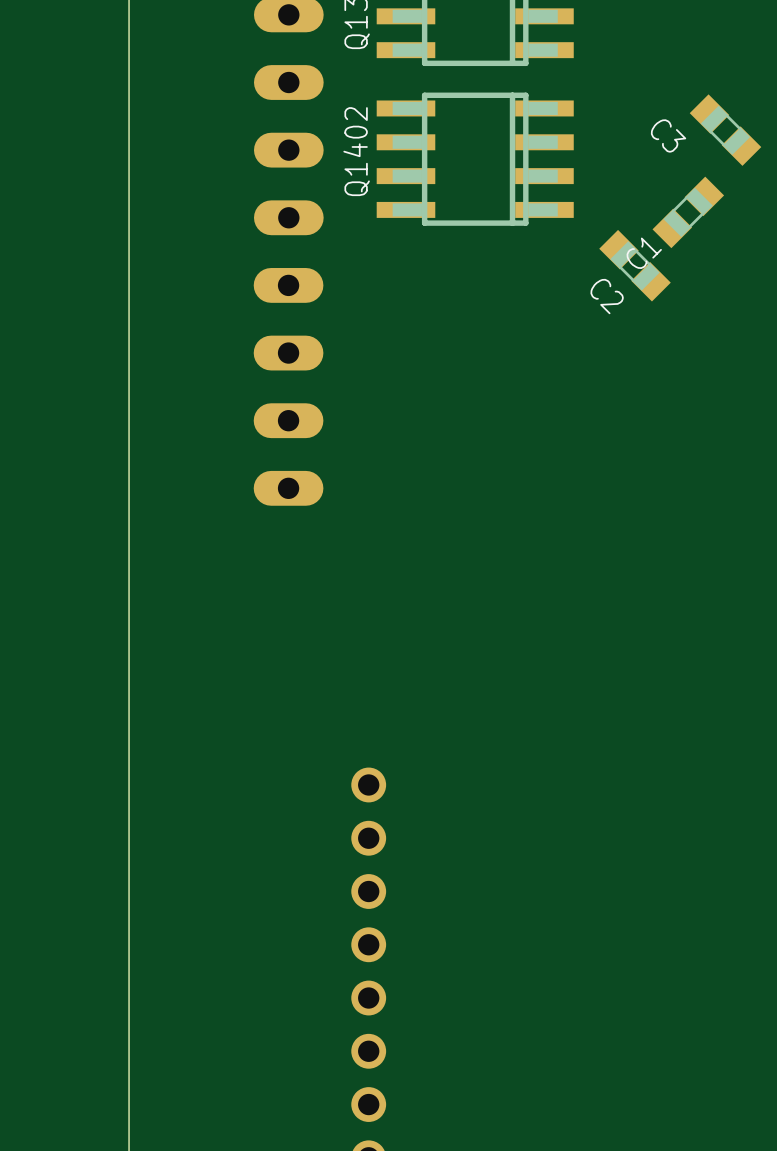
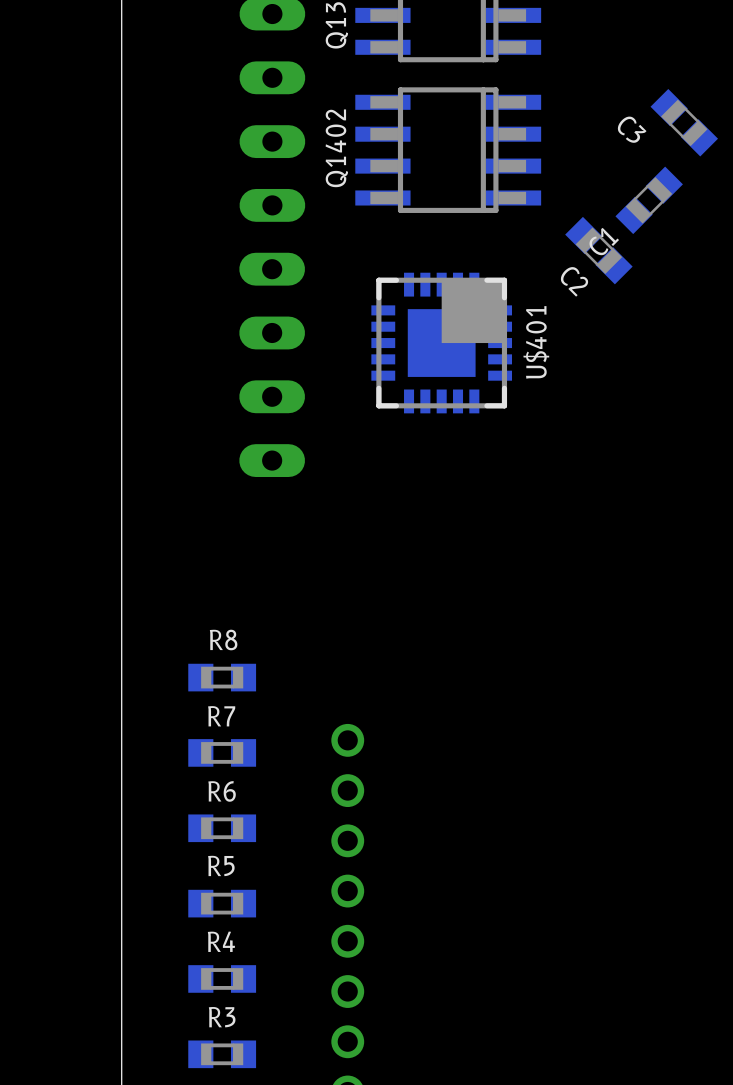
U$401: none -> (441, 343)
R8: none -> (222, 677)
R7: none -> (222, 752)
R6: none -> (222, 828)
R5: none -> (222, 903)
R4: none -> (222, 978)
R3: none -> (222, 1054)

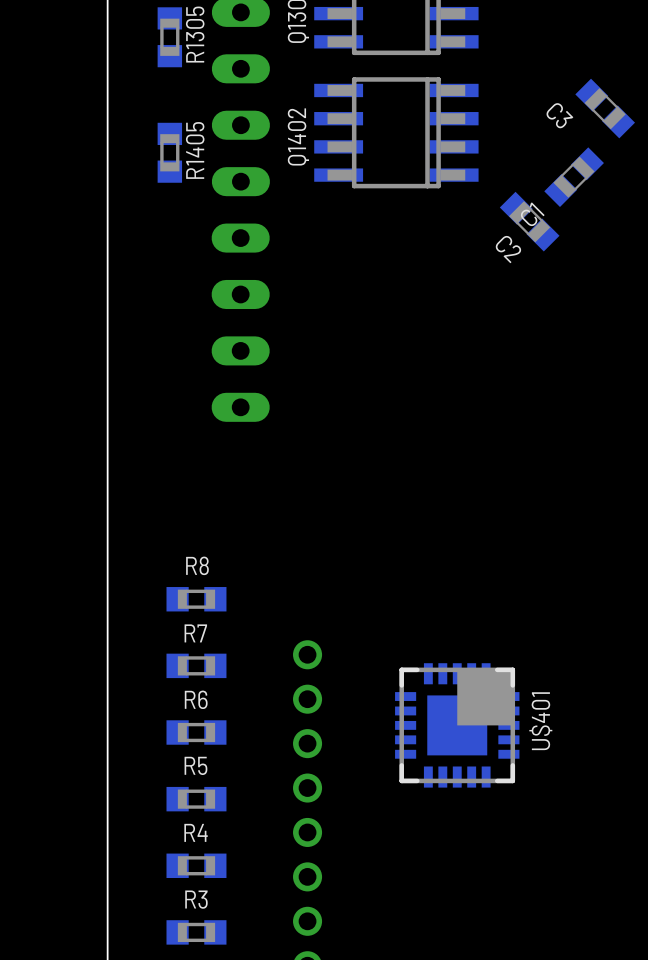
R1305: none -> (169, 37)
R1405: none -> (169, 152)
U$401 position: (441, 343) -> (457, 725)

